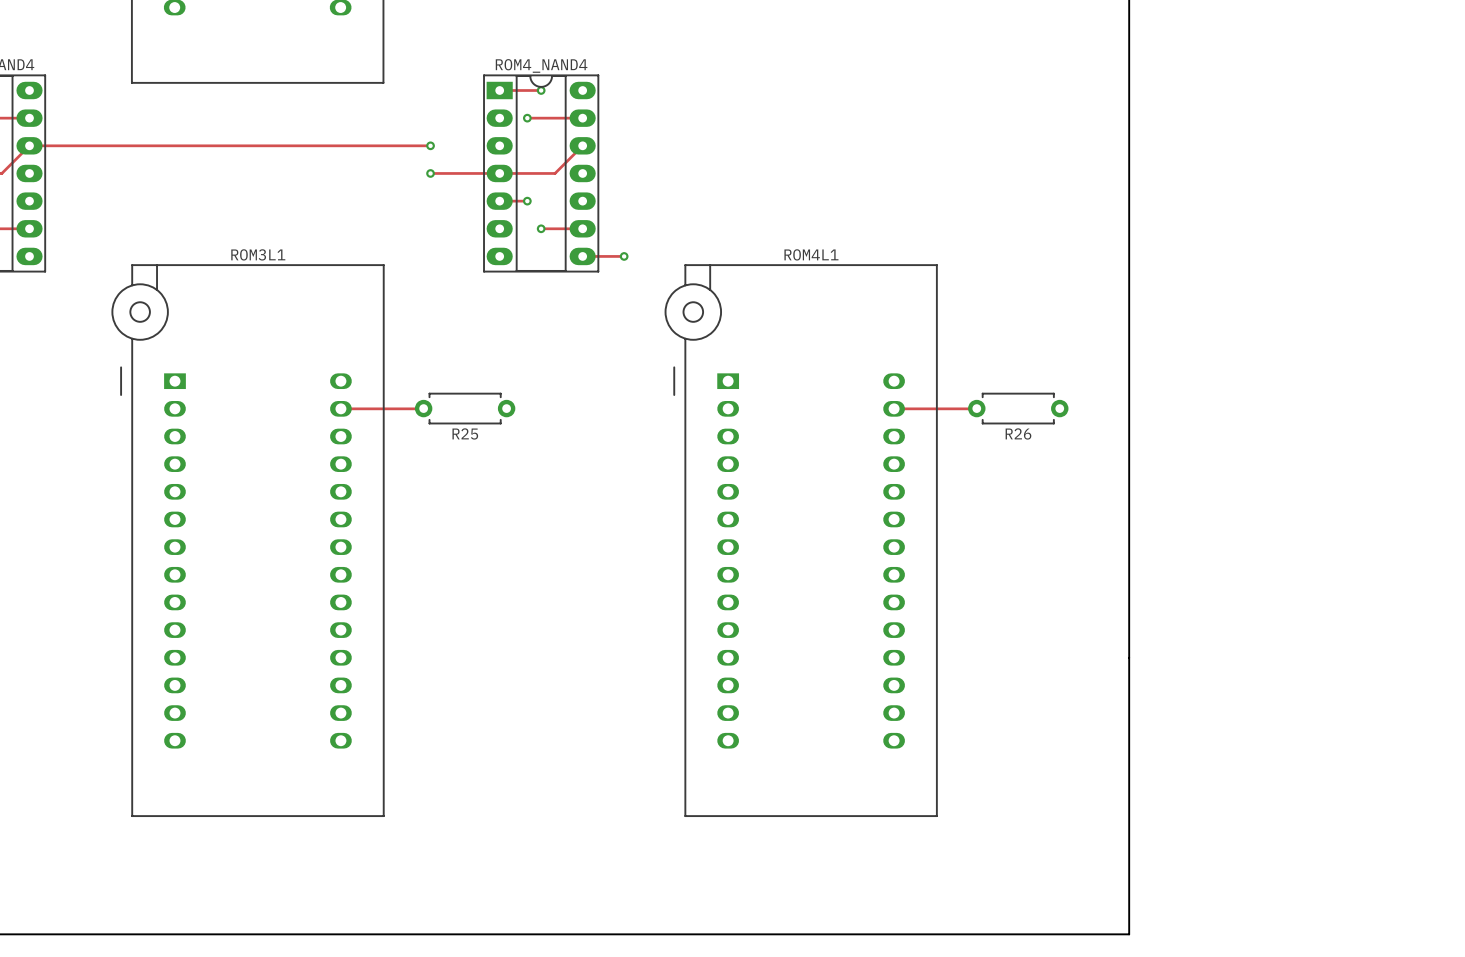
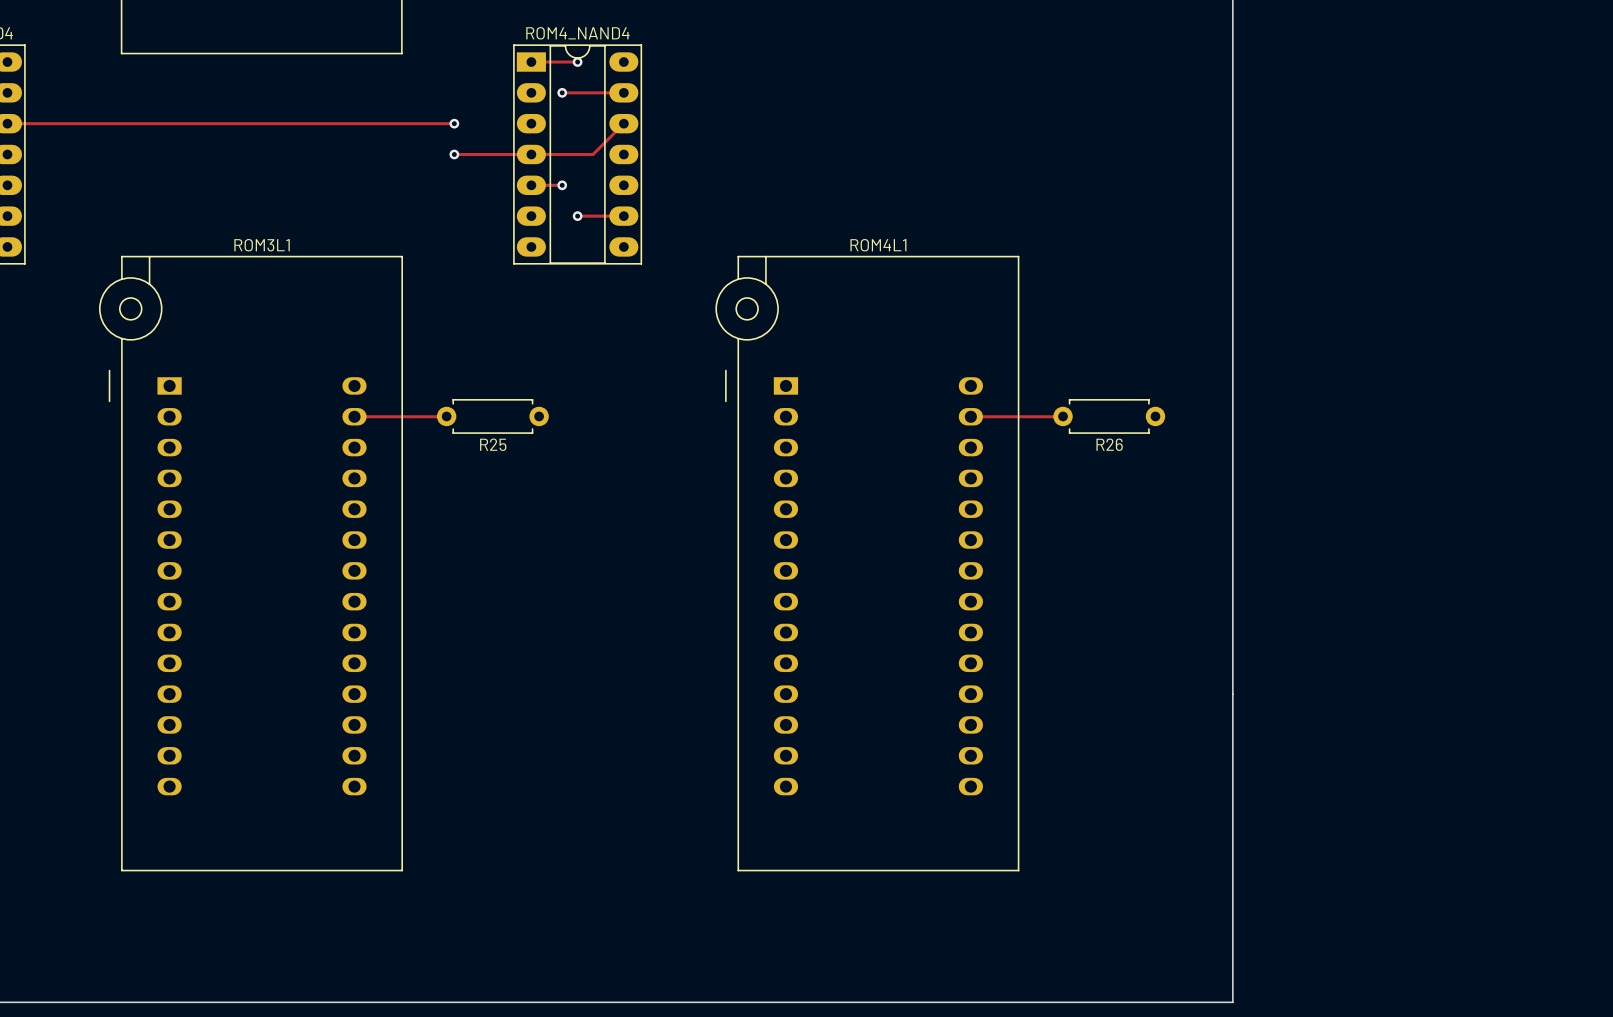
track: (582, 256) (624, 256) -> none
via: (624, 256) -> none

